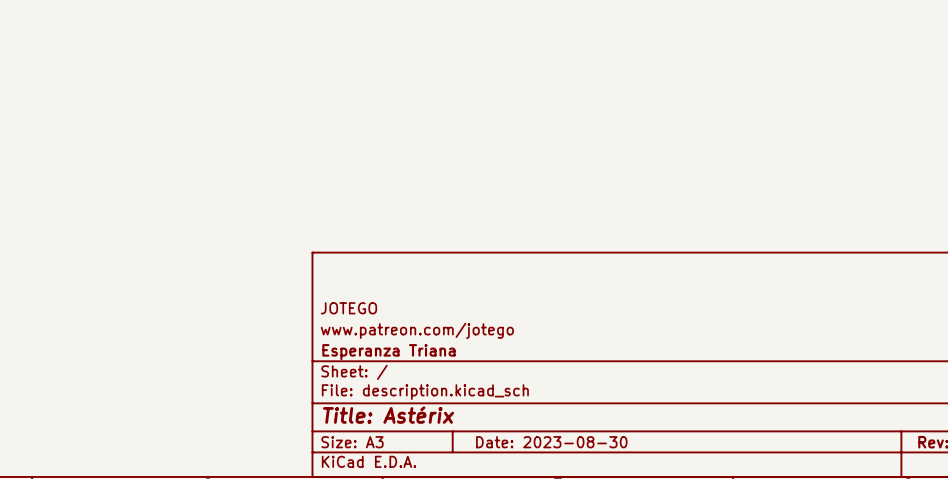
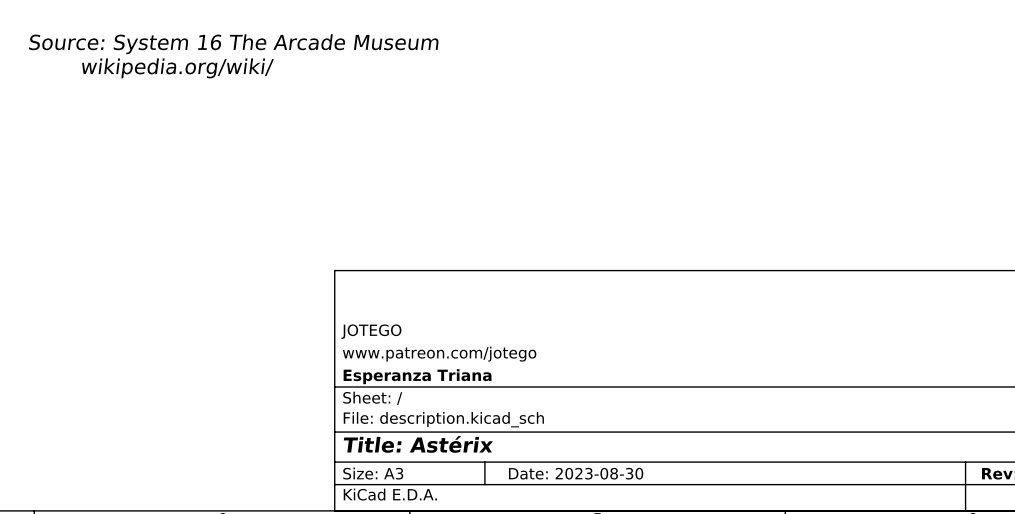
text: none -> Source: System 16 The Arcade Museum (233, 44)
text: none -> wikipedia.org/wiki/ (177, 68)

